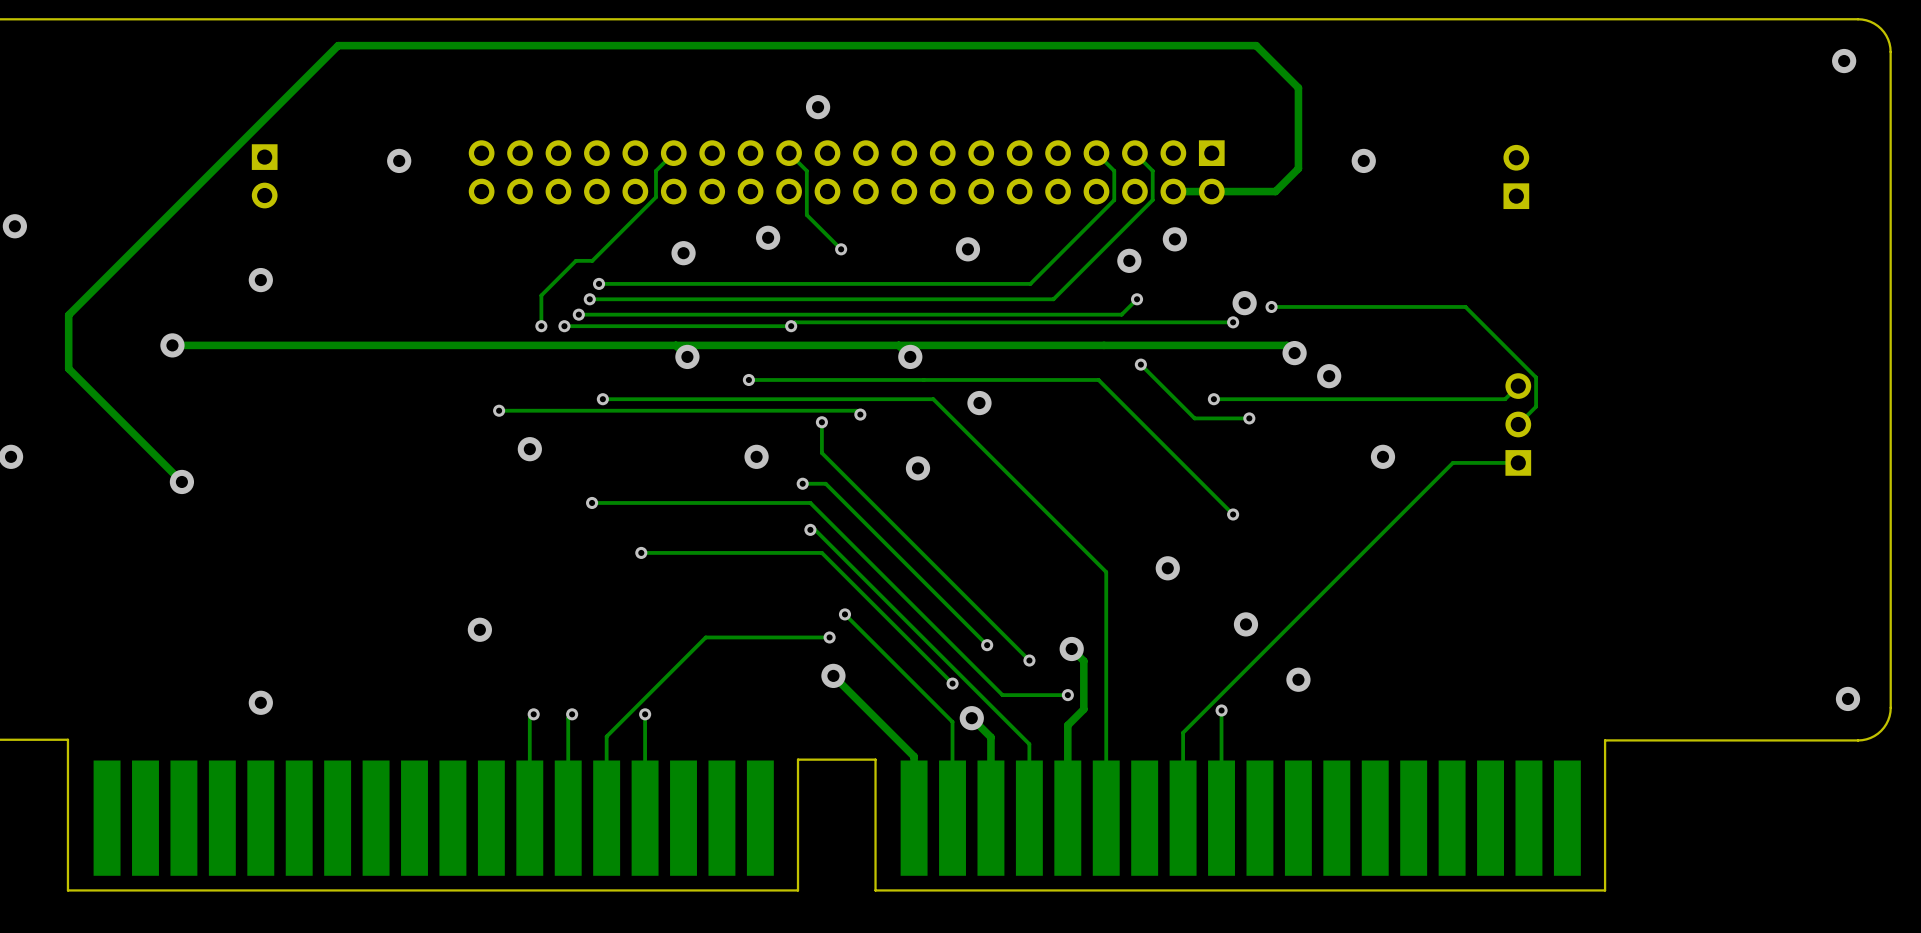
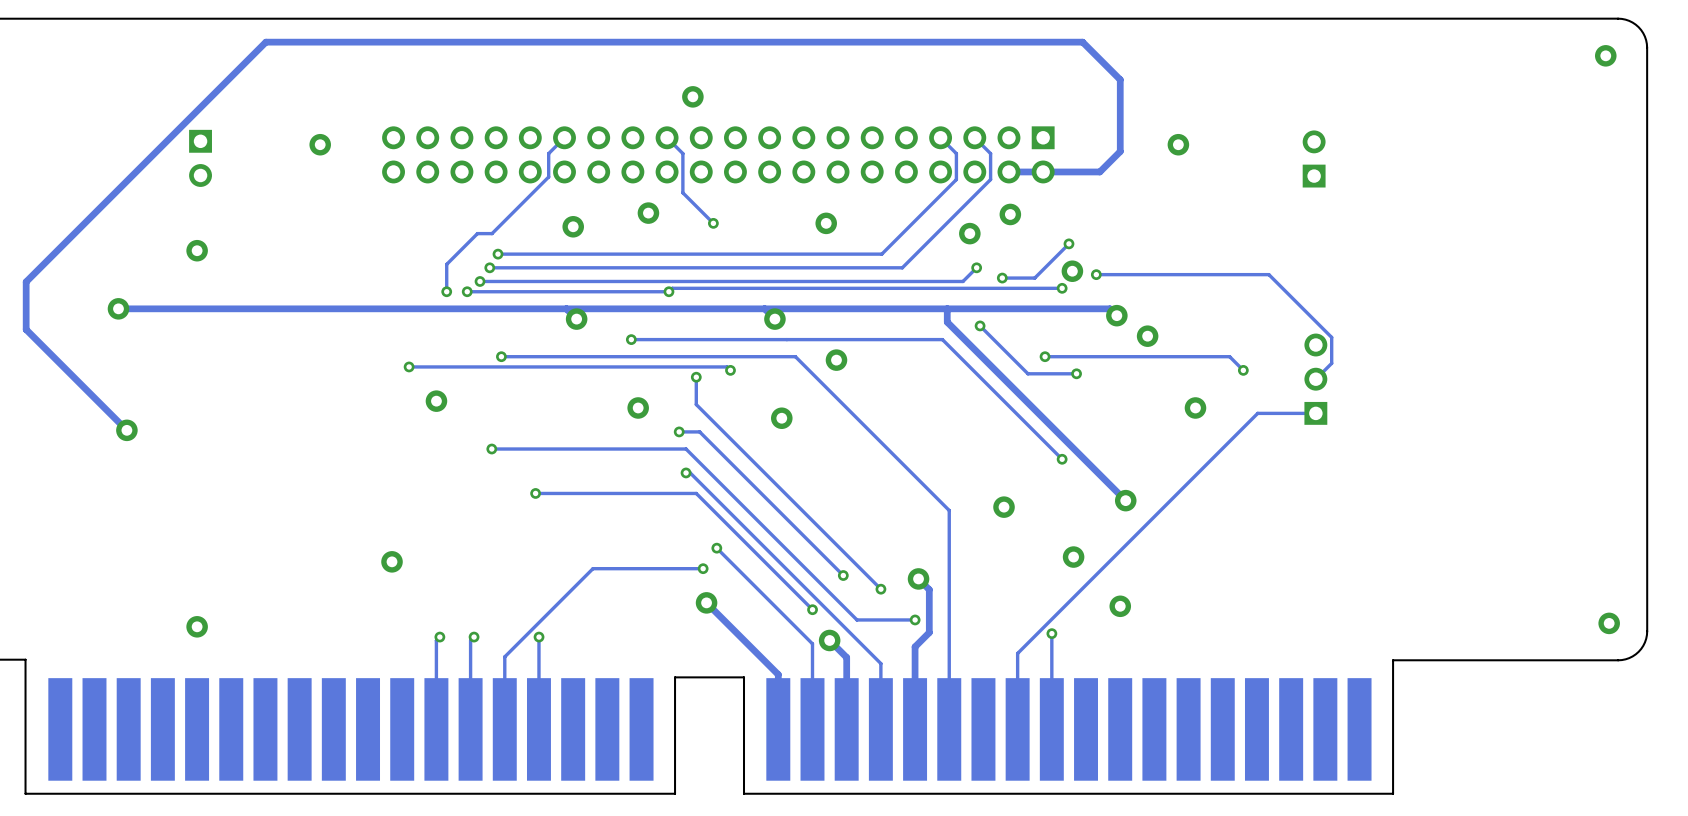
track: none -> (1068, 243) (1034, 278) (1002, 278)
via: none -> (1068, 243)
via: none -> (1002, 278)
track: none -> (947, 308) (947, 322) (1125, 500)
track: (1518, 386) (1505, 399) (1421, 399) -> (1243, 370) (1229, 356)
via: none -> (1243, 370)
via: none -> (1125, 500)

